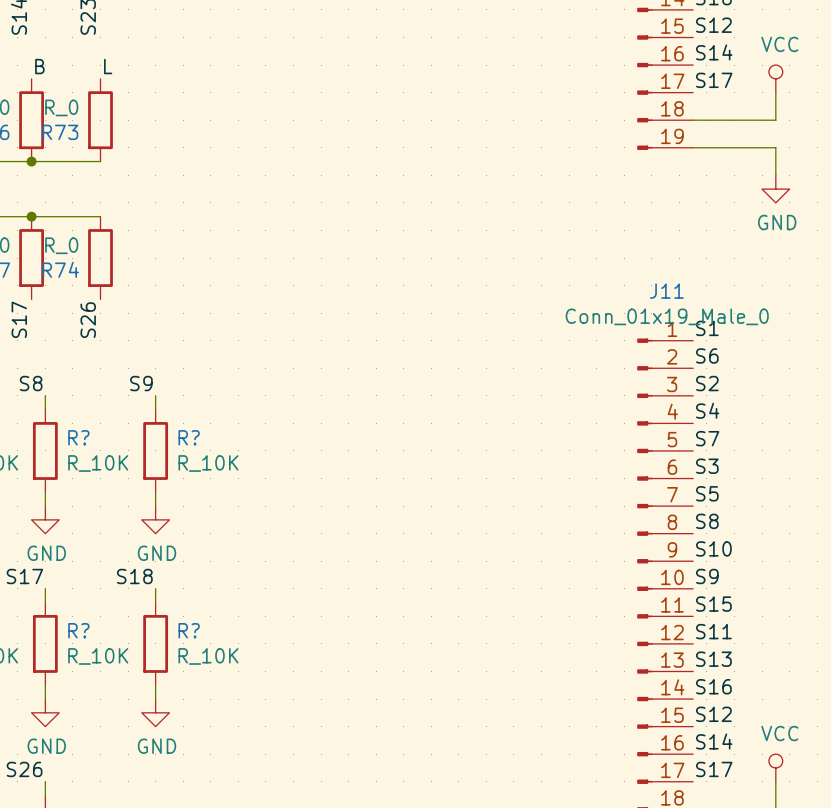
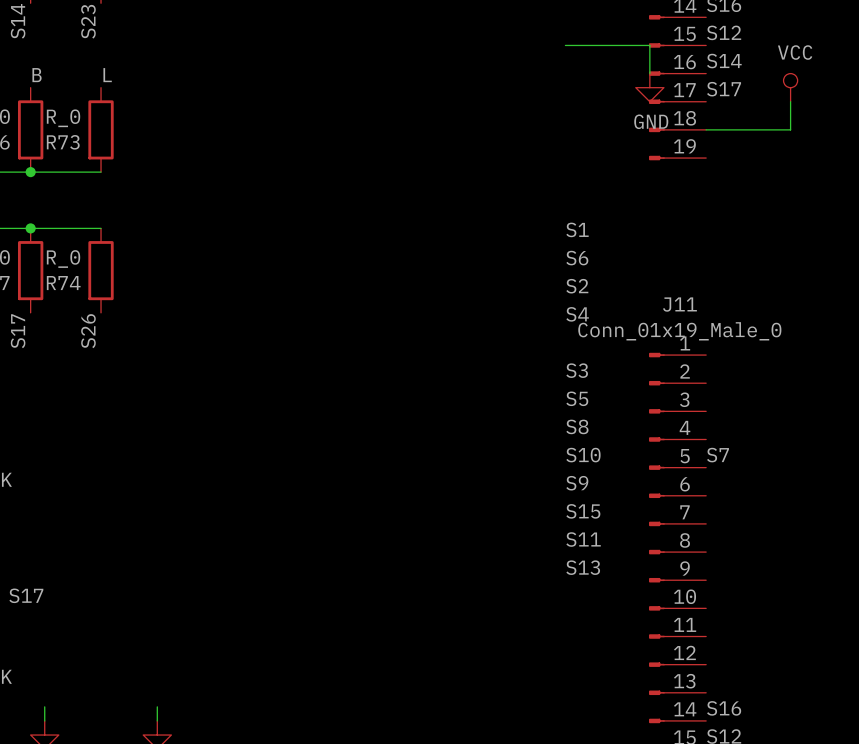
wire: (693, 147) (775, 147) (775, 175) -> (565, 45) (649, 45) (649, 73)
power symbol position: GND (775, 189) -> GND (649, 87)
label position: S1 (707, 328) -> S1 (577, 229)
label position: S6 (707, 355) -> S6 (577, 258)
label: S8 (31, 383) -> none
label: S9 (141, 383) -> none
label position: S2 (707, 383) -> S2 (577, 286)
wire: (45, 395) (45, 409) -> none
wire: (155, 395) (155, 409) -> none
label position: S4 (707, 410) -> S4 (577, 314)
R?: R_10K (45, 450) -> none
R?: R_10K (155, 450) -> none
label position: S3 (707, 466) -> S3 (577, 370)
wire: (45, 492) (45, 506) -> none
wire: (155, 492) (155, 506) -> none
label position: S5 (707, 493) -> S5 (577, 398)
power symbol: GND (45, 519) -> none
power symbol: GND (155, 519) -> none
label position: S8 (707, 521) -> S8 (577, 426)
label position: S10 (713, 548) -> S10 (583, 455)
label: S18 (134, 576) -> none
label position: S9 (707, 576) -> S9 (577, 483)
wire: (45, 588) (45, 602) -> none
wire: (155, 588) (155, 602) -> none
label position: S15 (713, 604) -> S15 (583, 511)
label position: S11 (713, 631) -> S11 (583, 539)
R?: R_10K (45, 643) -> none
R?: R_10K (155, 643) -> none
label position: S13 (713, 659) -> S13 (583, 567)

